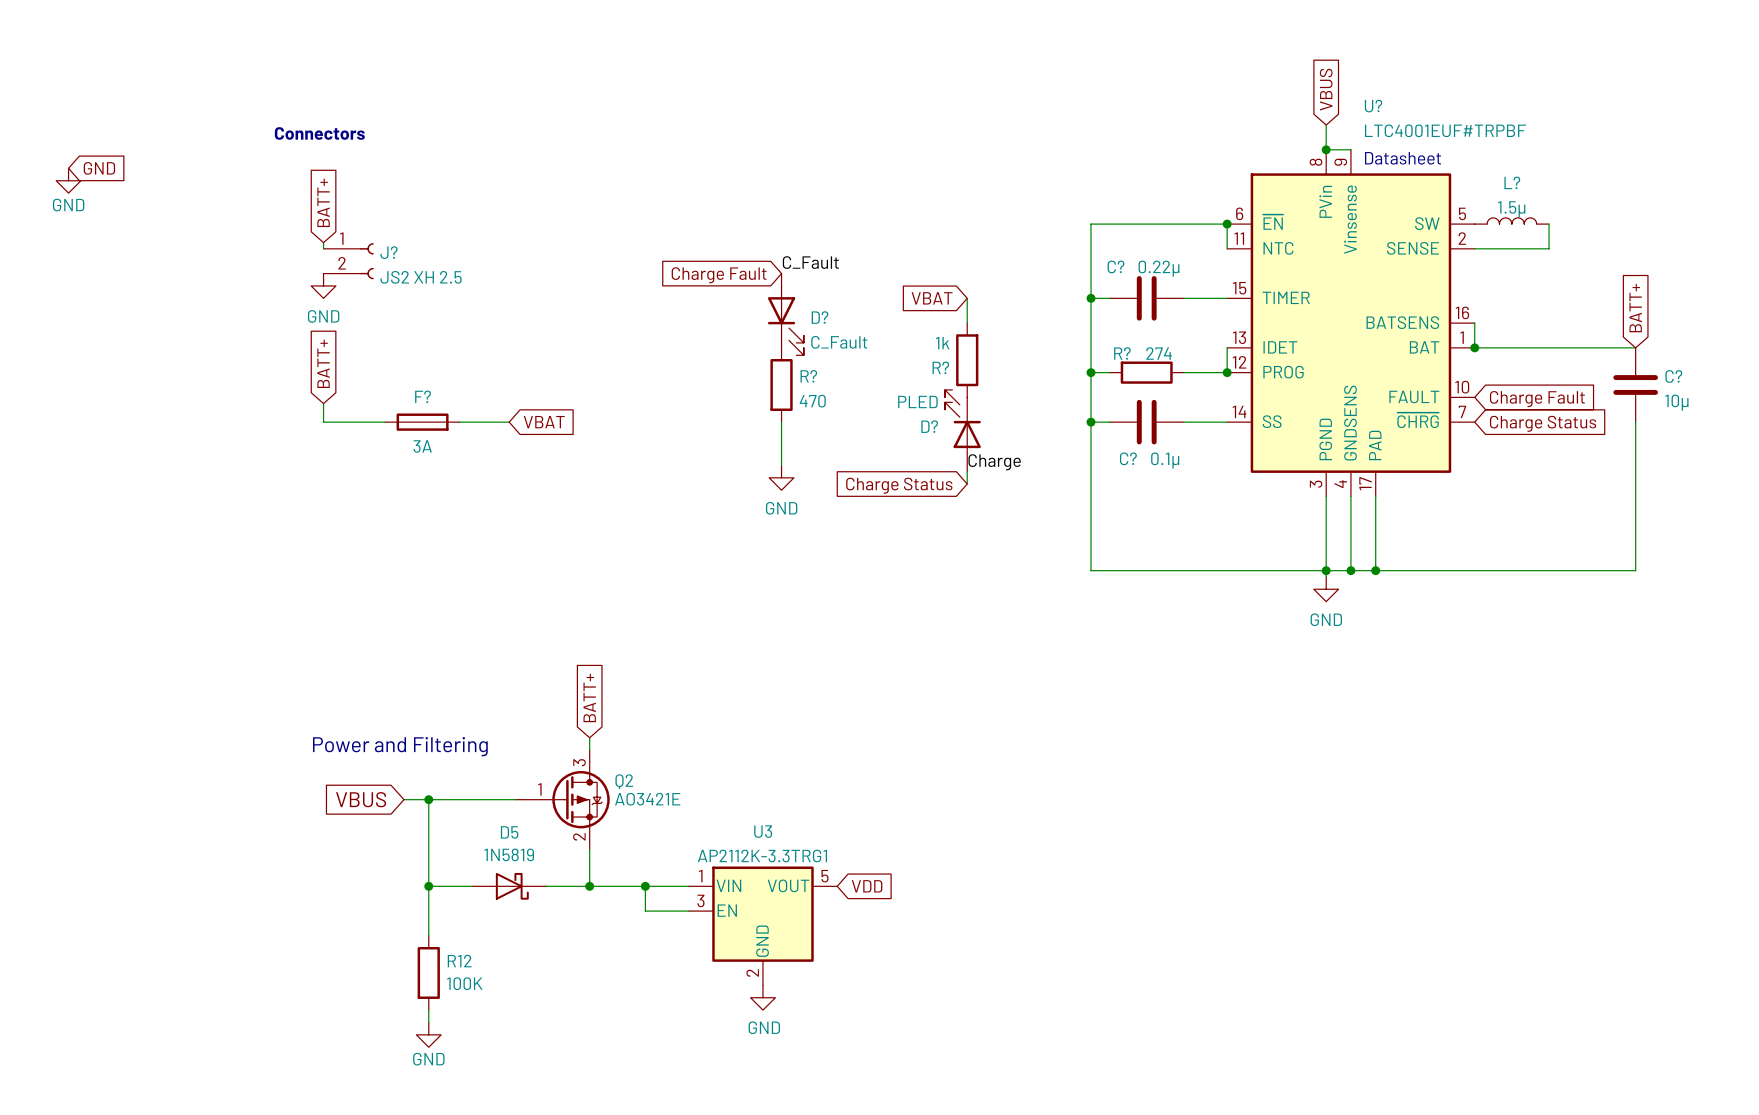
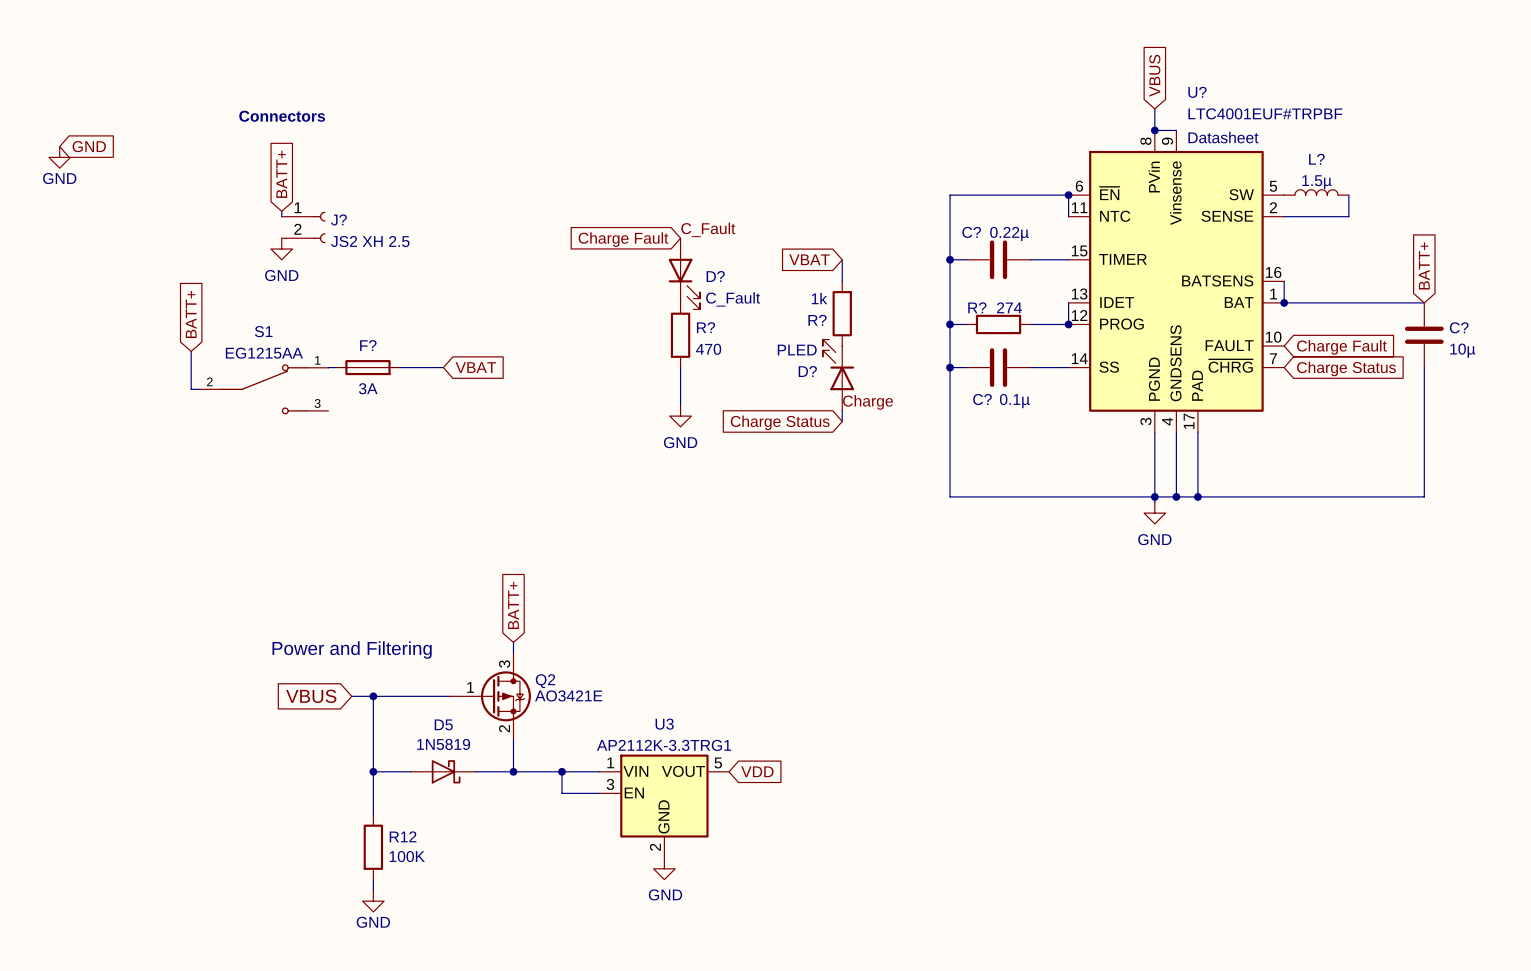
global label position: BATT+ (323, 363) -> BATT+ (191, 314)
wire: none -> (191, 351) (191, 389) (199, 389)
S1: none -> EG1215AA (263, 389)

